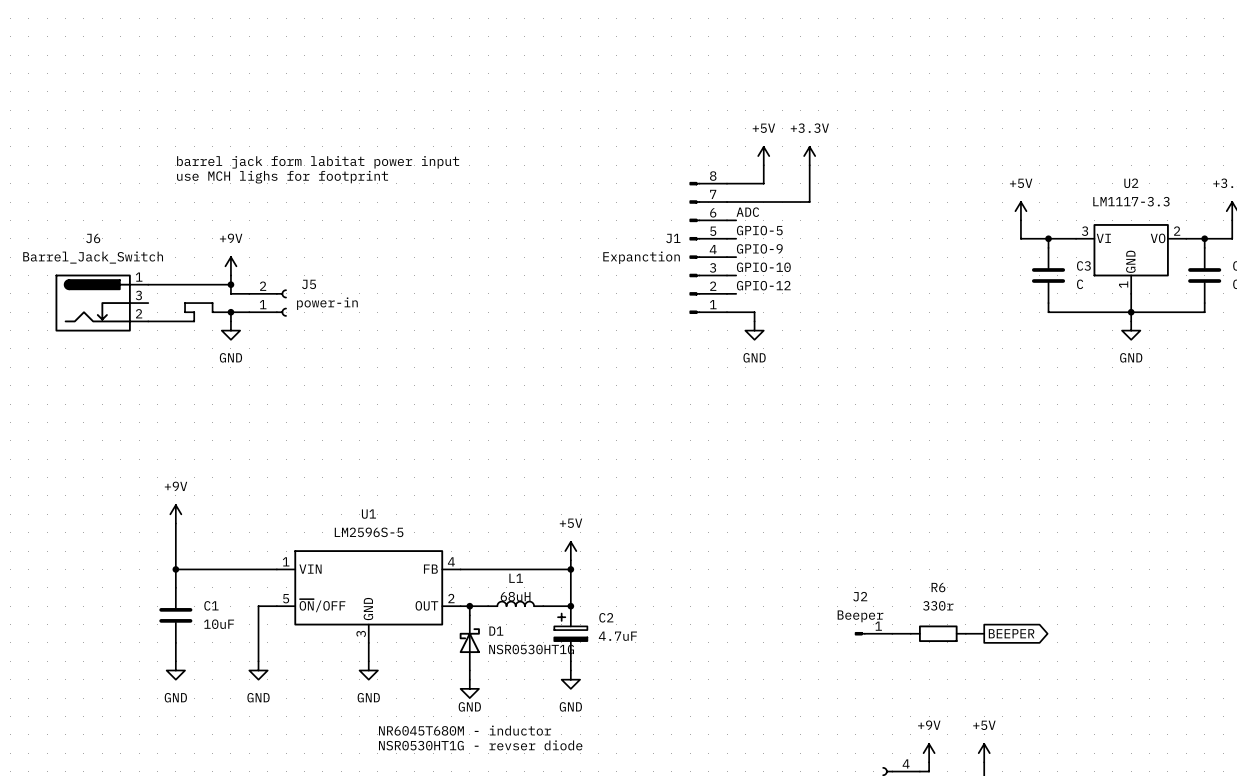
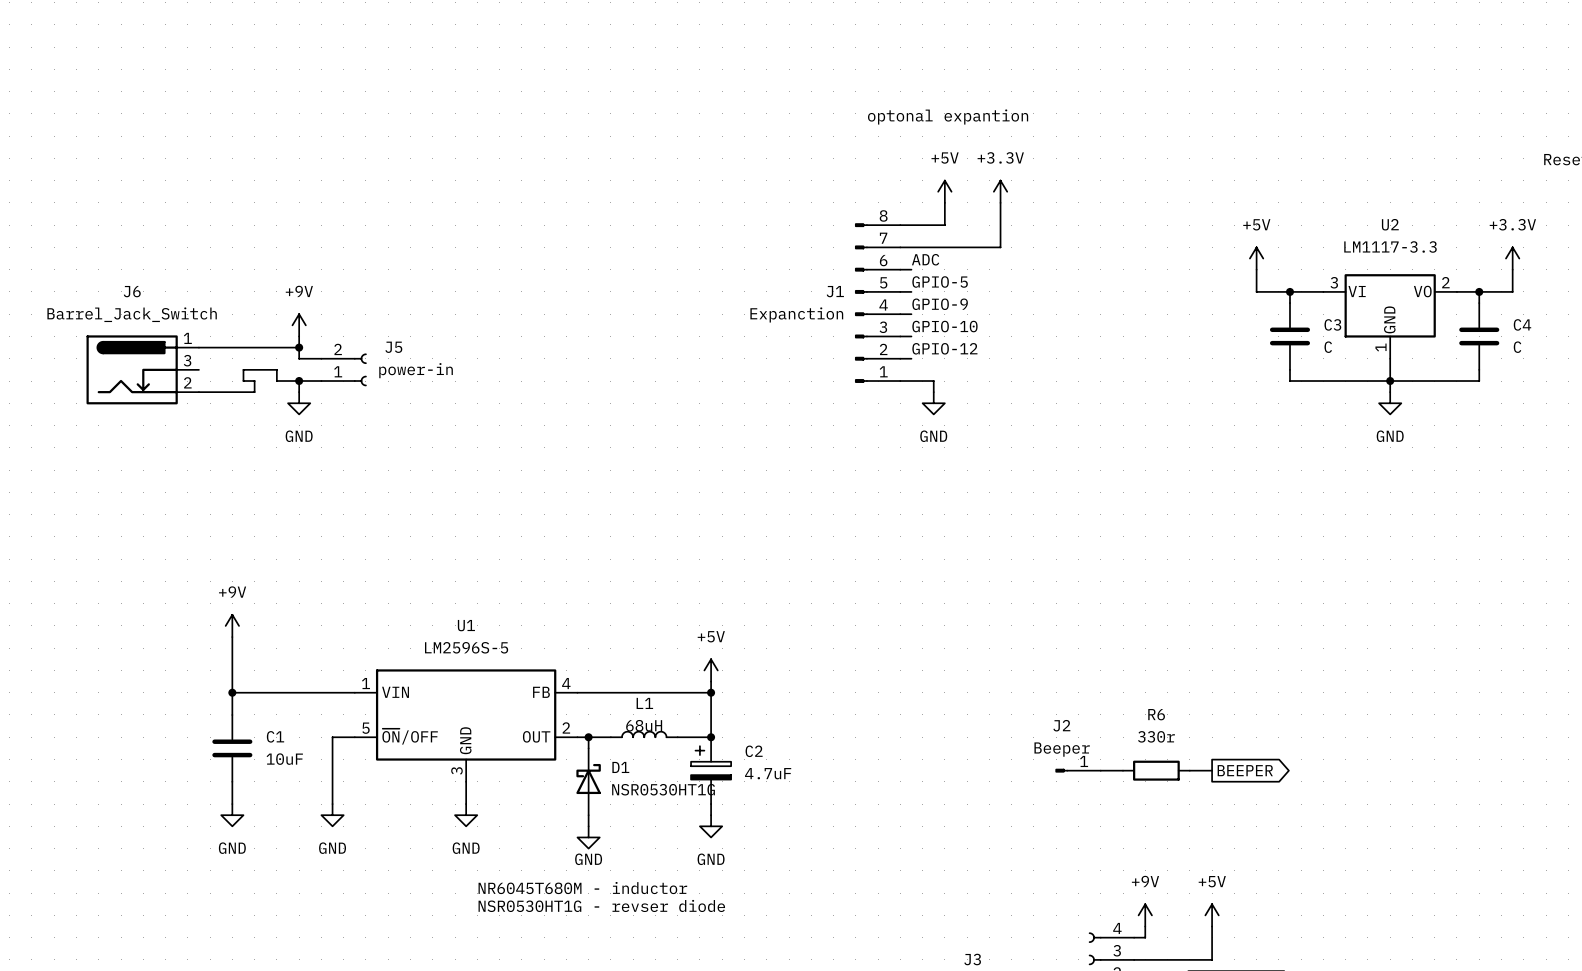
text: none -> optonal expantion (948, 117)
text: barrel jack form labitat power input (318, 162) -> none
text: use MCH lighs for footprint (282, 177) -> none

